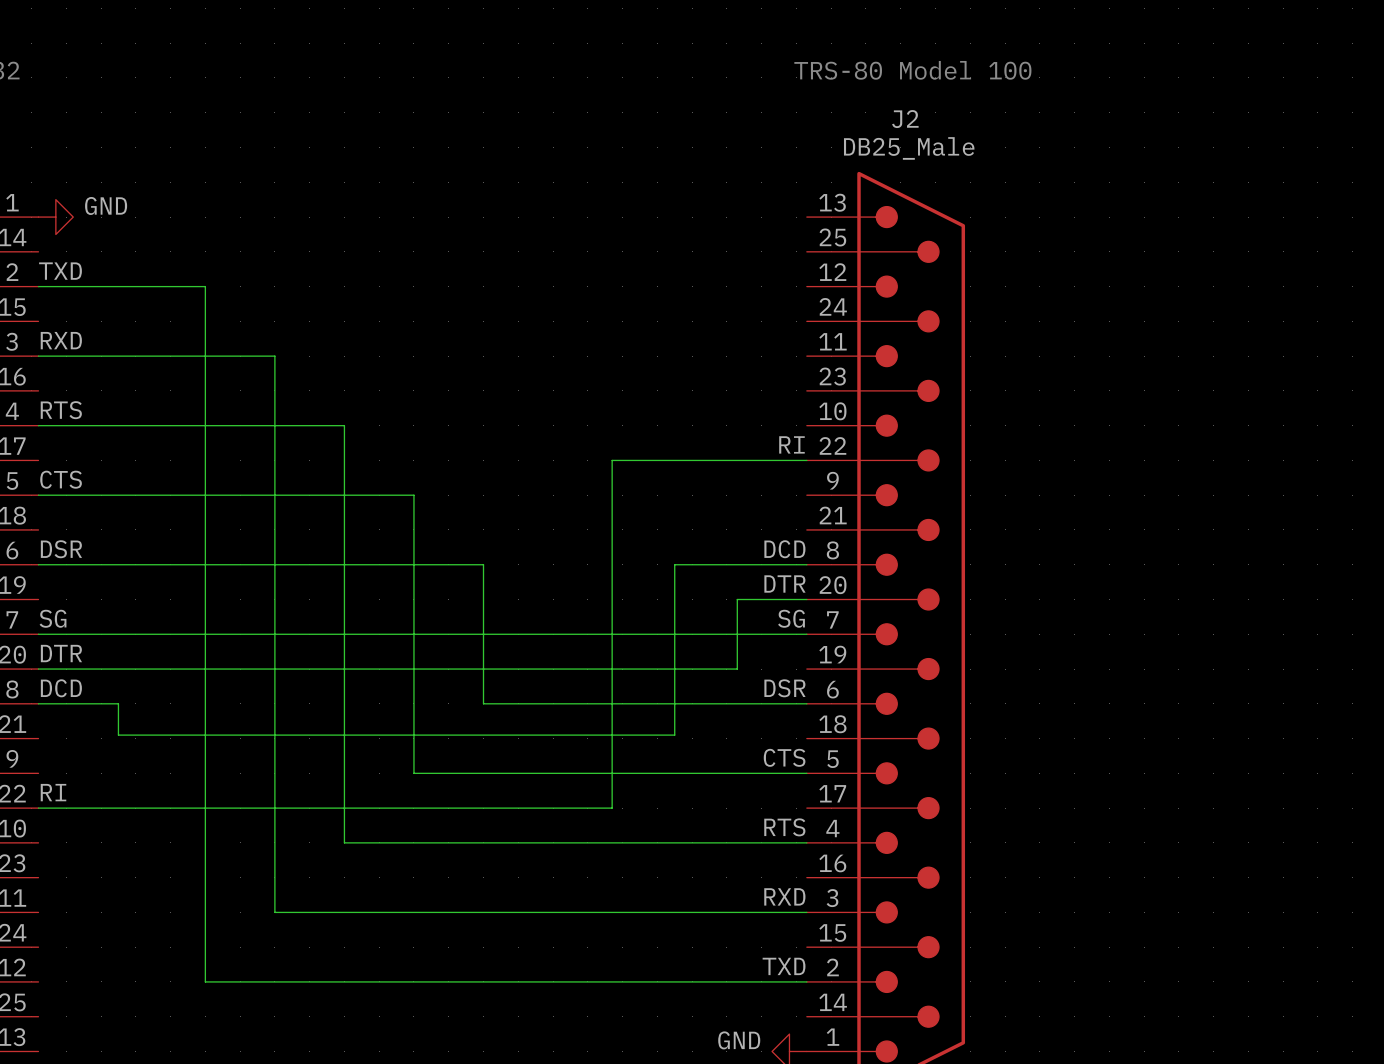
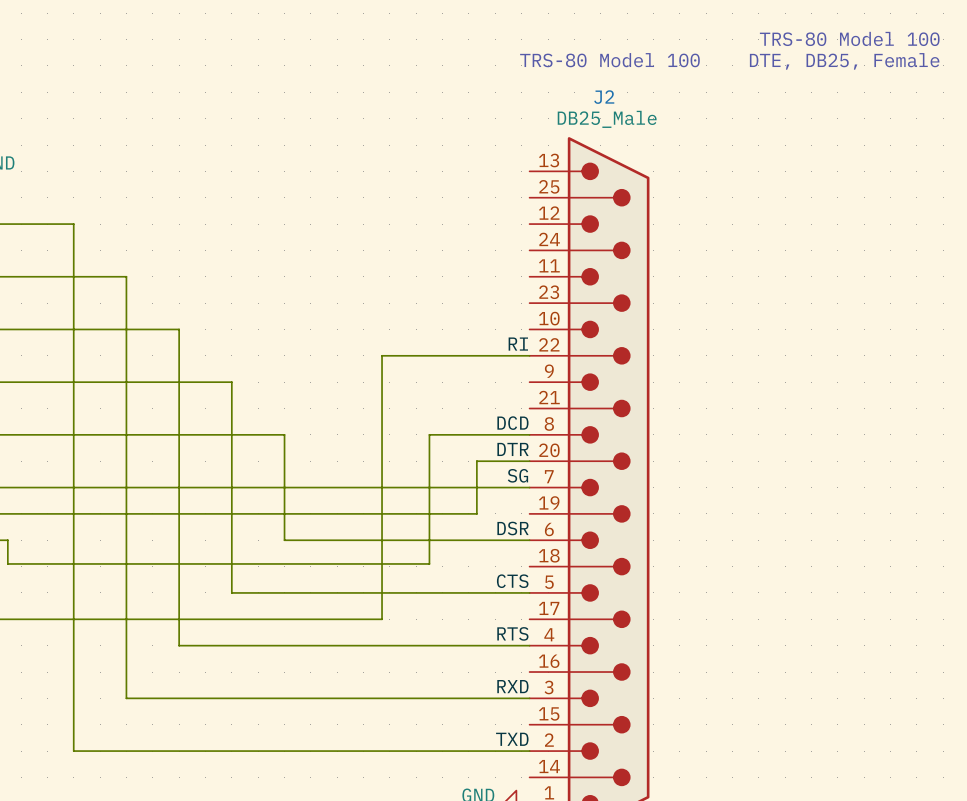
text: none -> TRS-80 Model 100 (849, 38)
text: none -> DTE, DB25, Female (844, 61)

